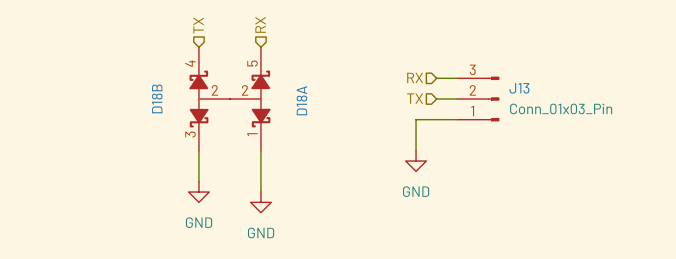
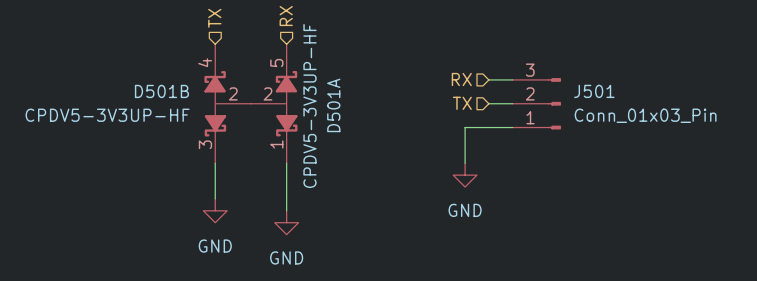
J13 name: J13 (519, 88) -> J501 (594, 91)
D18B name: D18B (157, 98) -> D501B (161, 91)
D18A value: none -> CPDV5-3V3UP-HF (309, 105)
D18A name: D18A (301, 100) -> D501A (333, 105)
D18B value: none -> CPDV5-3V3UP-HF (107, 115)

